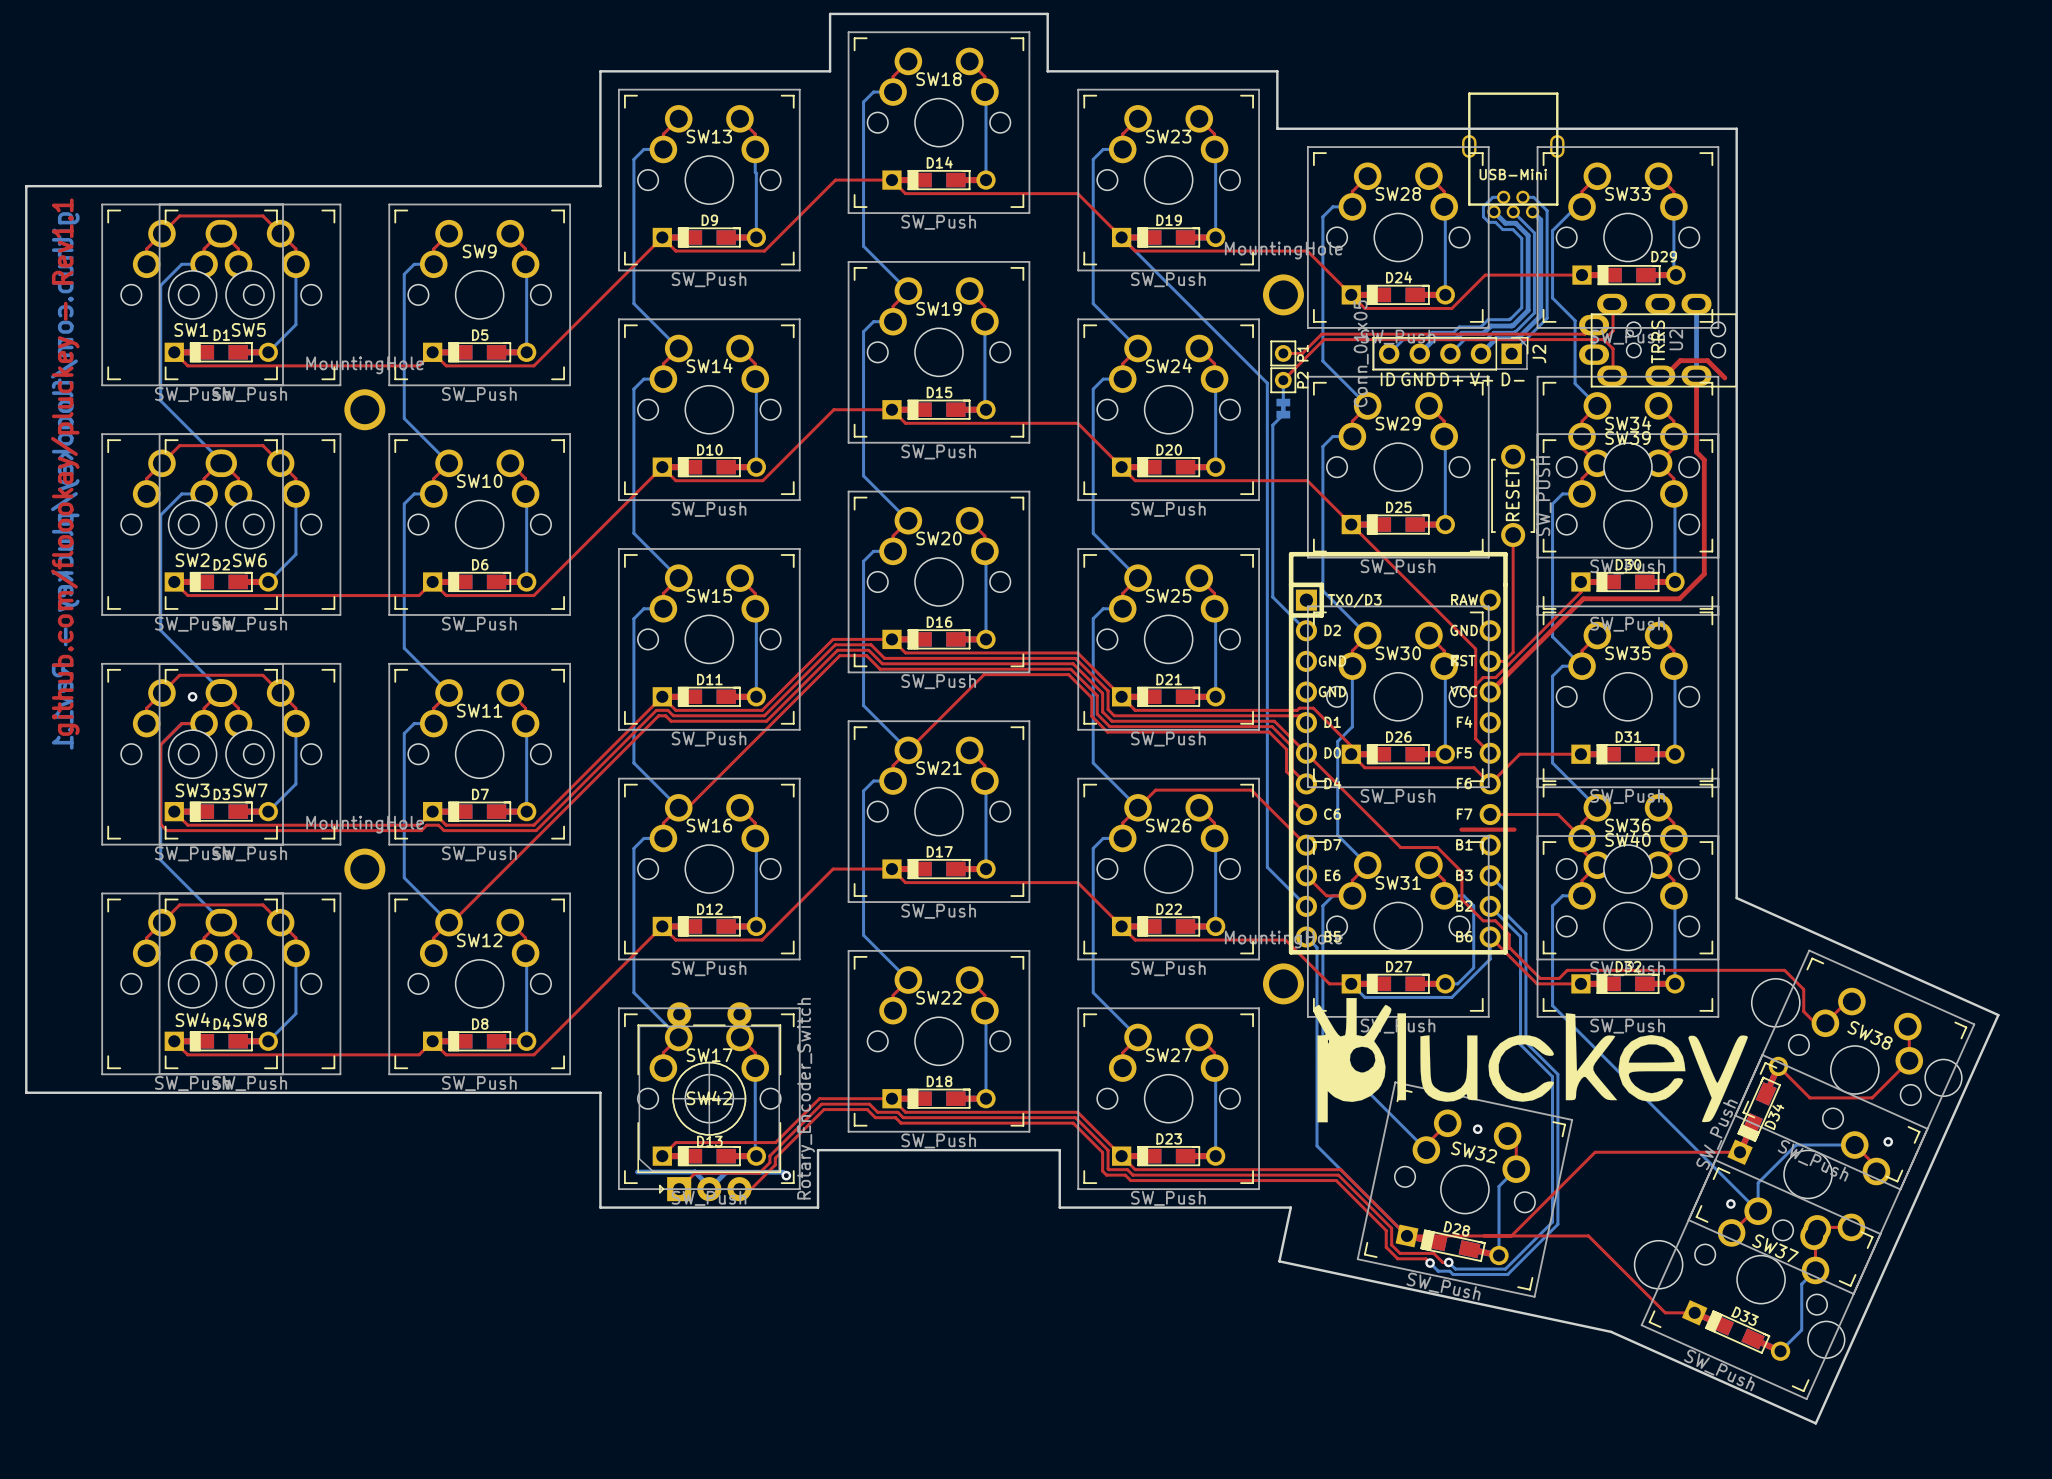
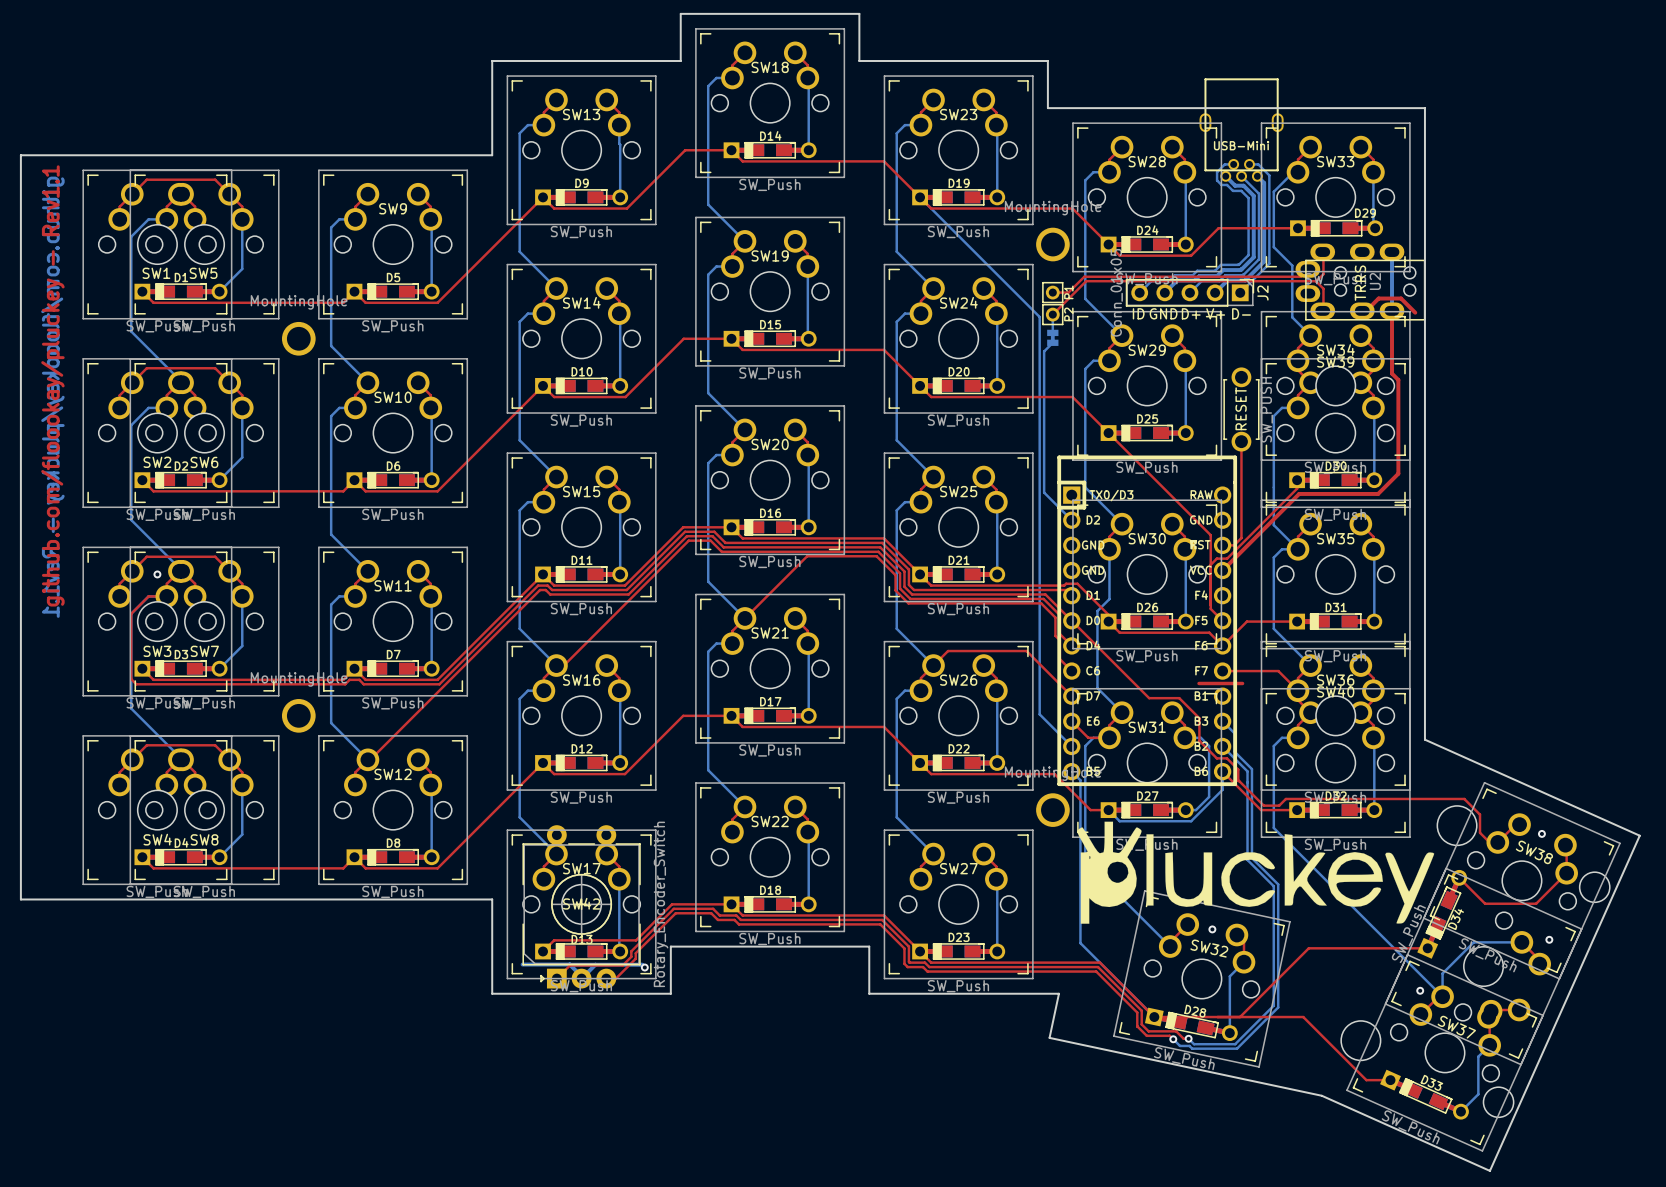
via: none -> (1541, 833)

